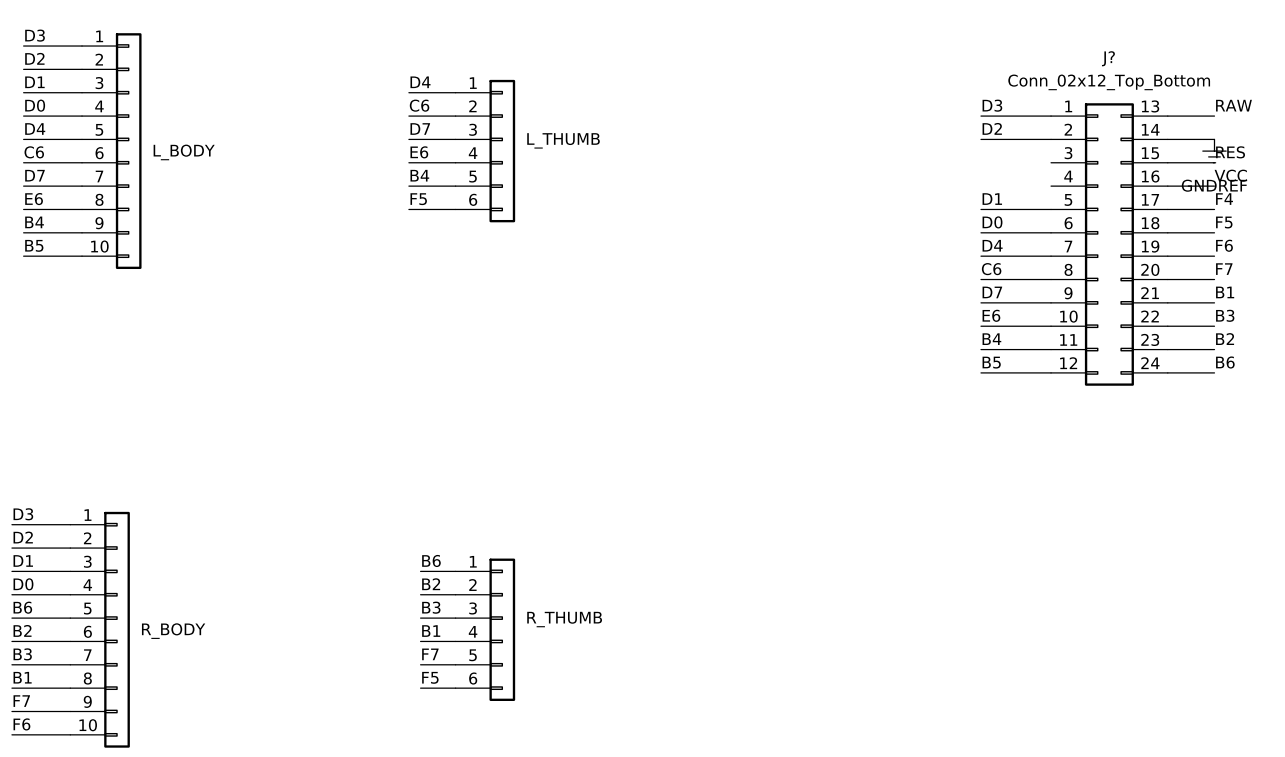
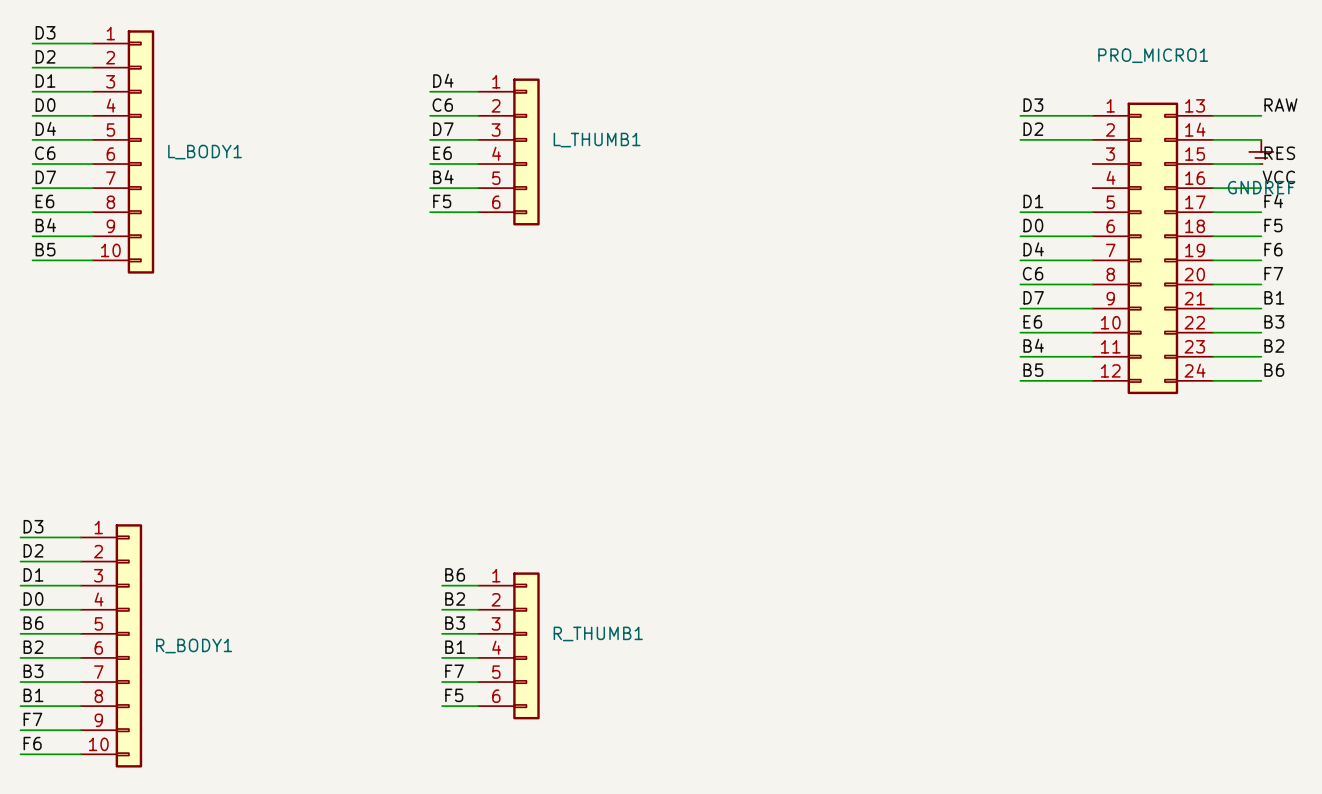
J? name: J? (1108, 58) -> PRO_MICRO1 (1153, 55)
J? value: Conn_02x12_Top_Bottom (1109, 82) -> none
L_THUMB name: L_THUMB (563, 140) -> L_THUMB1 (597, 140)
L_BODY name: L_BODY (184, 152) -> L_BODY1 (205, 152)
R_THUMB name: R_THUMB (564, 619) -> R_THUMB1 (598, 633)
R_BODY name: R_BODY (173, 631) -> R_BODY1 (194, 646)

